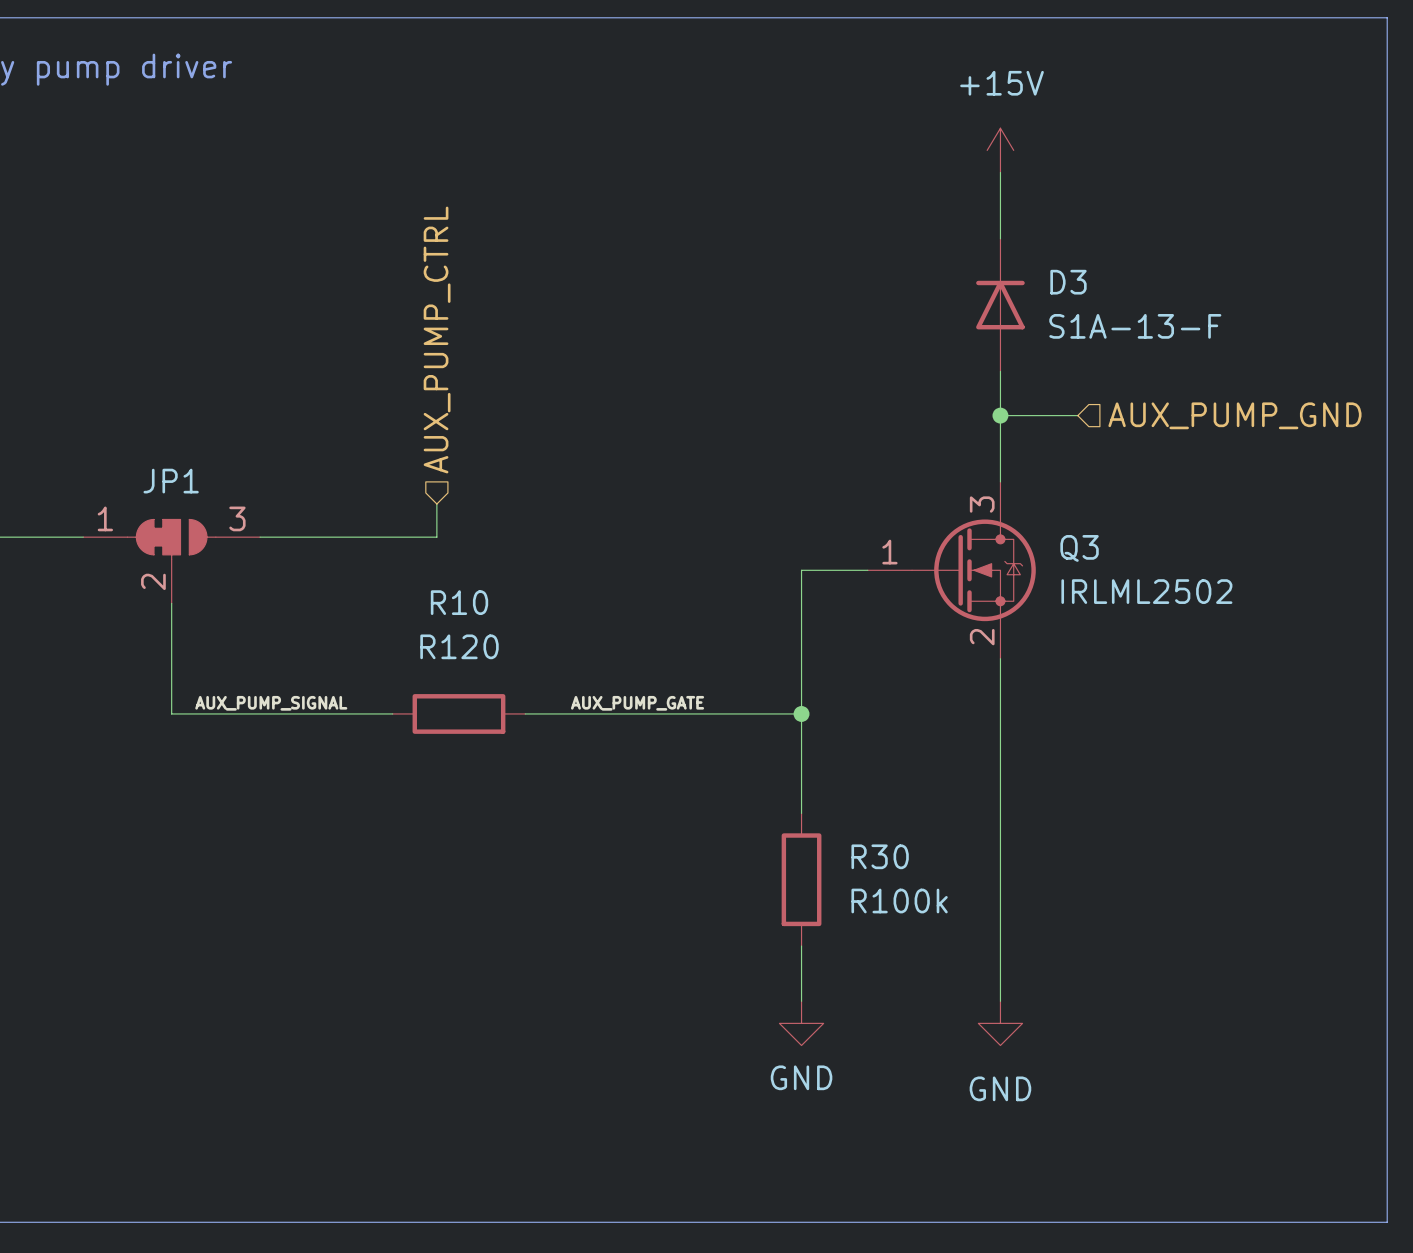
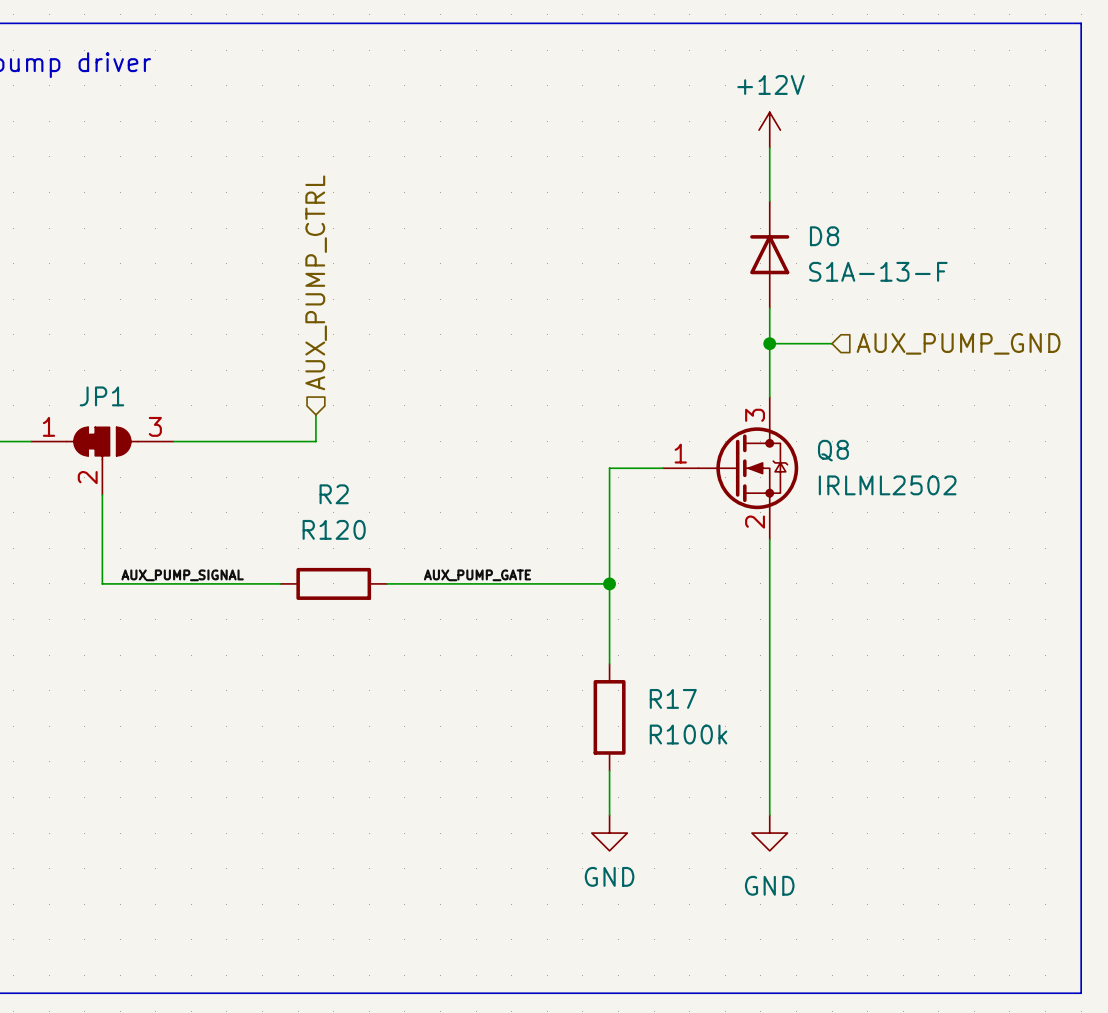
power symbol: +15V (1000, 150) -> +12V (769, 130)
D3 name: D3 (1068, 282) -> D8 (824, 236)
Q3 name: Q3 (1079, 548) -> Q8 (833, 450)
R10 name: R10 (459, 602) -> R2 (334, 494)
R30 name: R30 (880, 856) -> R17 (673, 698)

